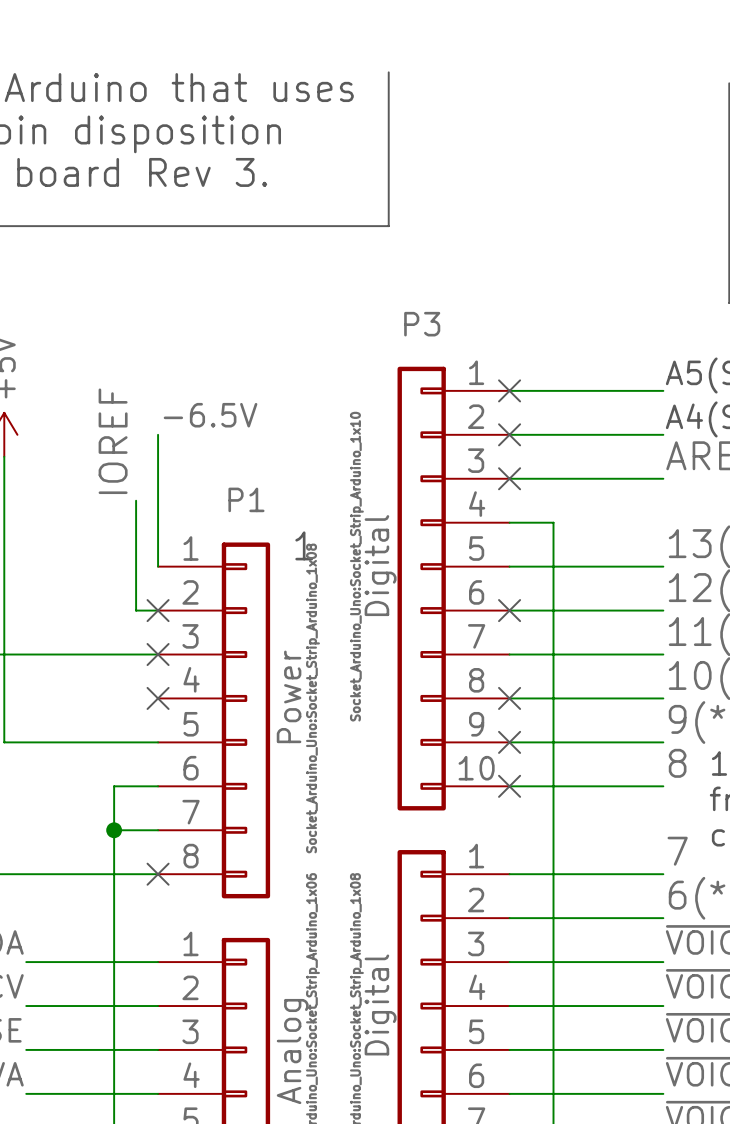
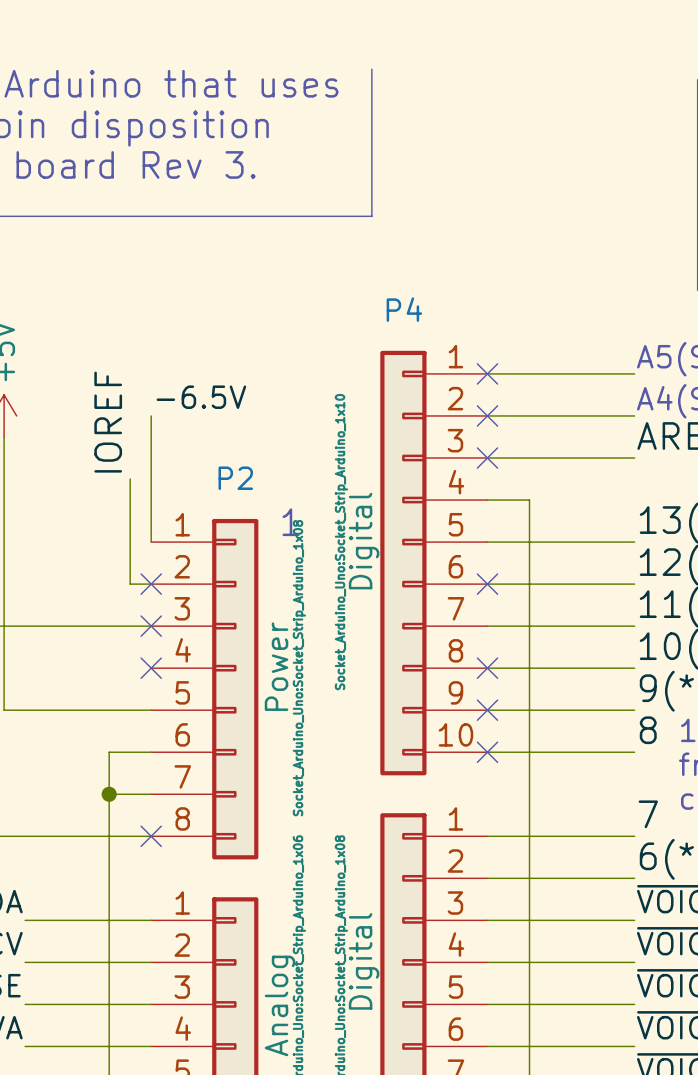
P3 name: P3 (422, 324) -> P4 (404, 309)
P1 name: P1 (246, 499) -> P2 (235, 478)

